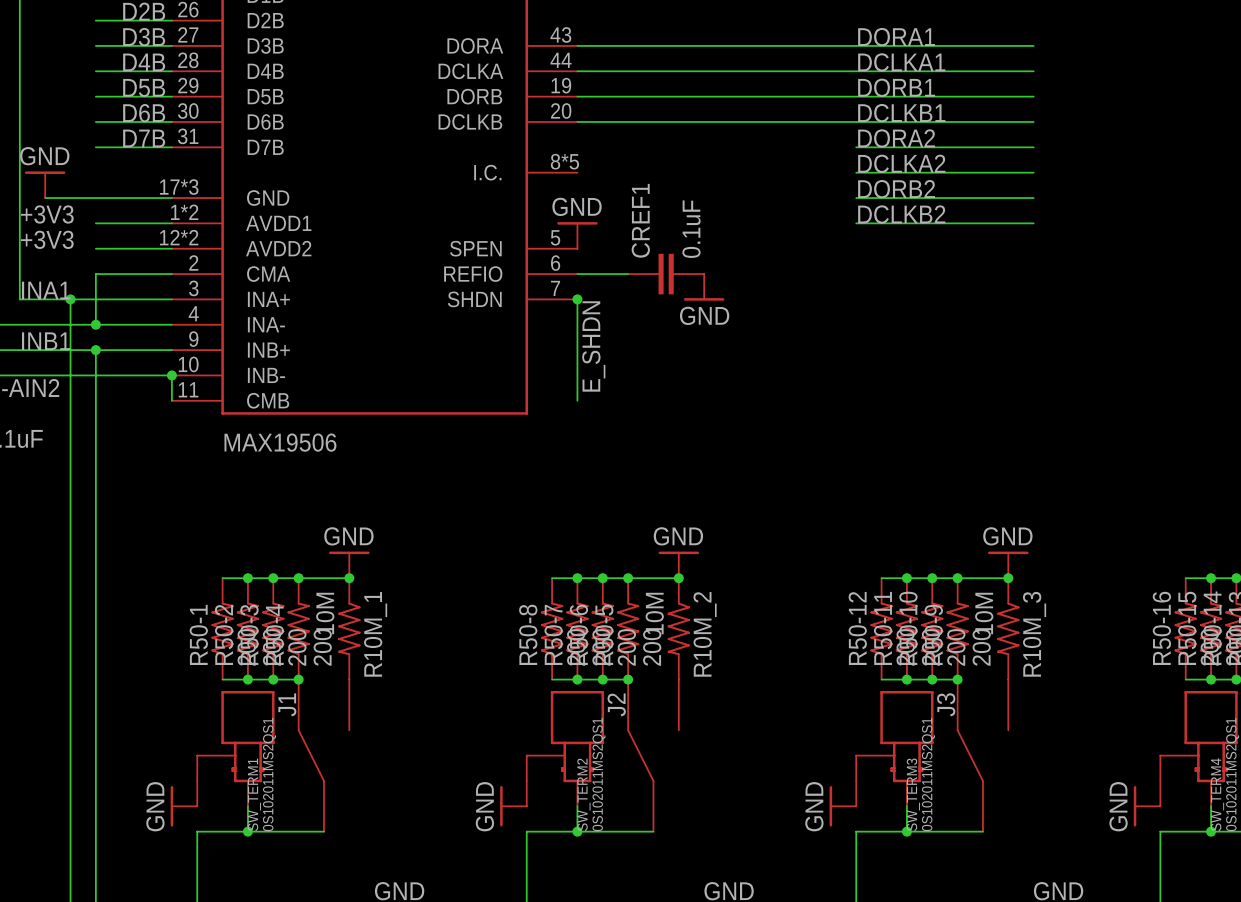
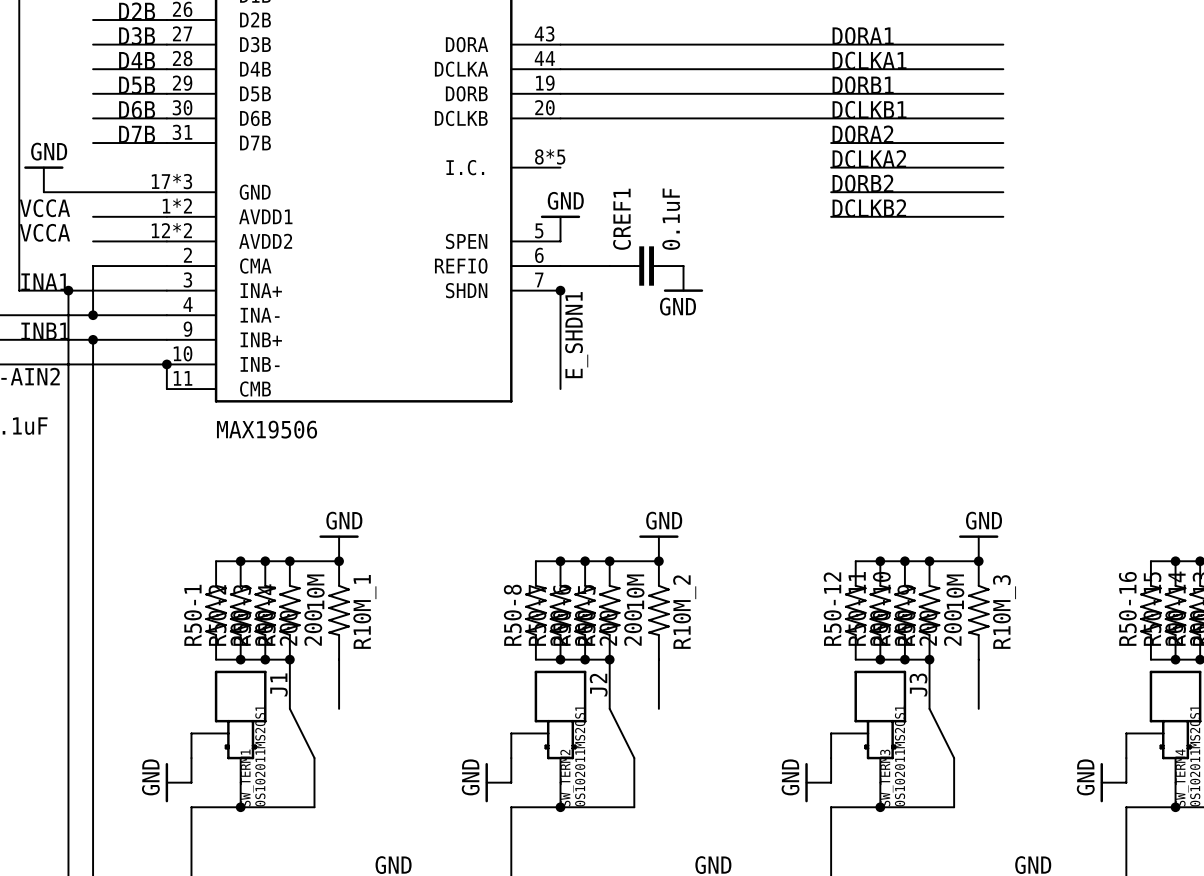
label: +3V3 (47, 214) -> VCCA (44, 208)
label: +3V3 (47, 239) -> VCCA (44, 232)
label: E_SHDN (593, 346) -> E_SHDN1 (576, 335)

